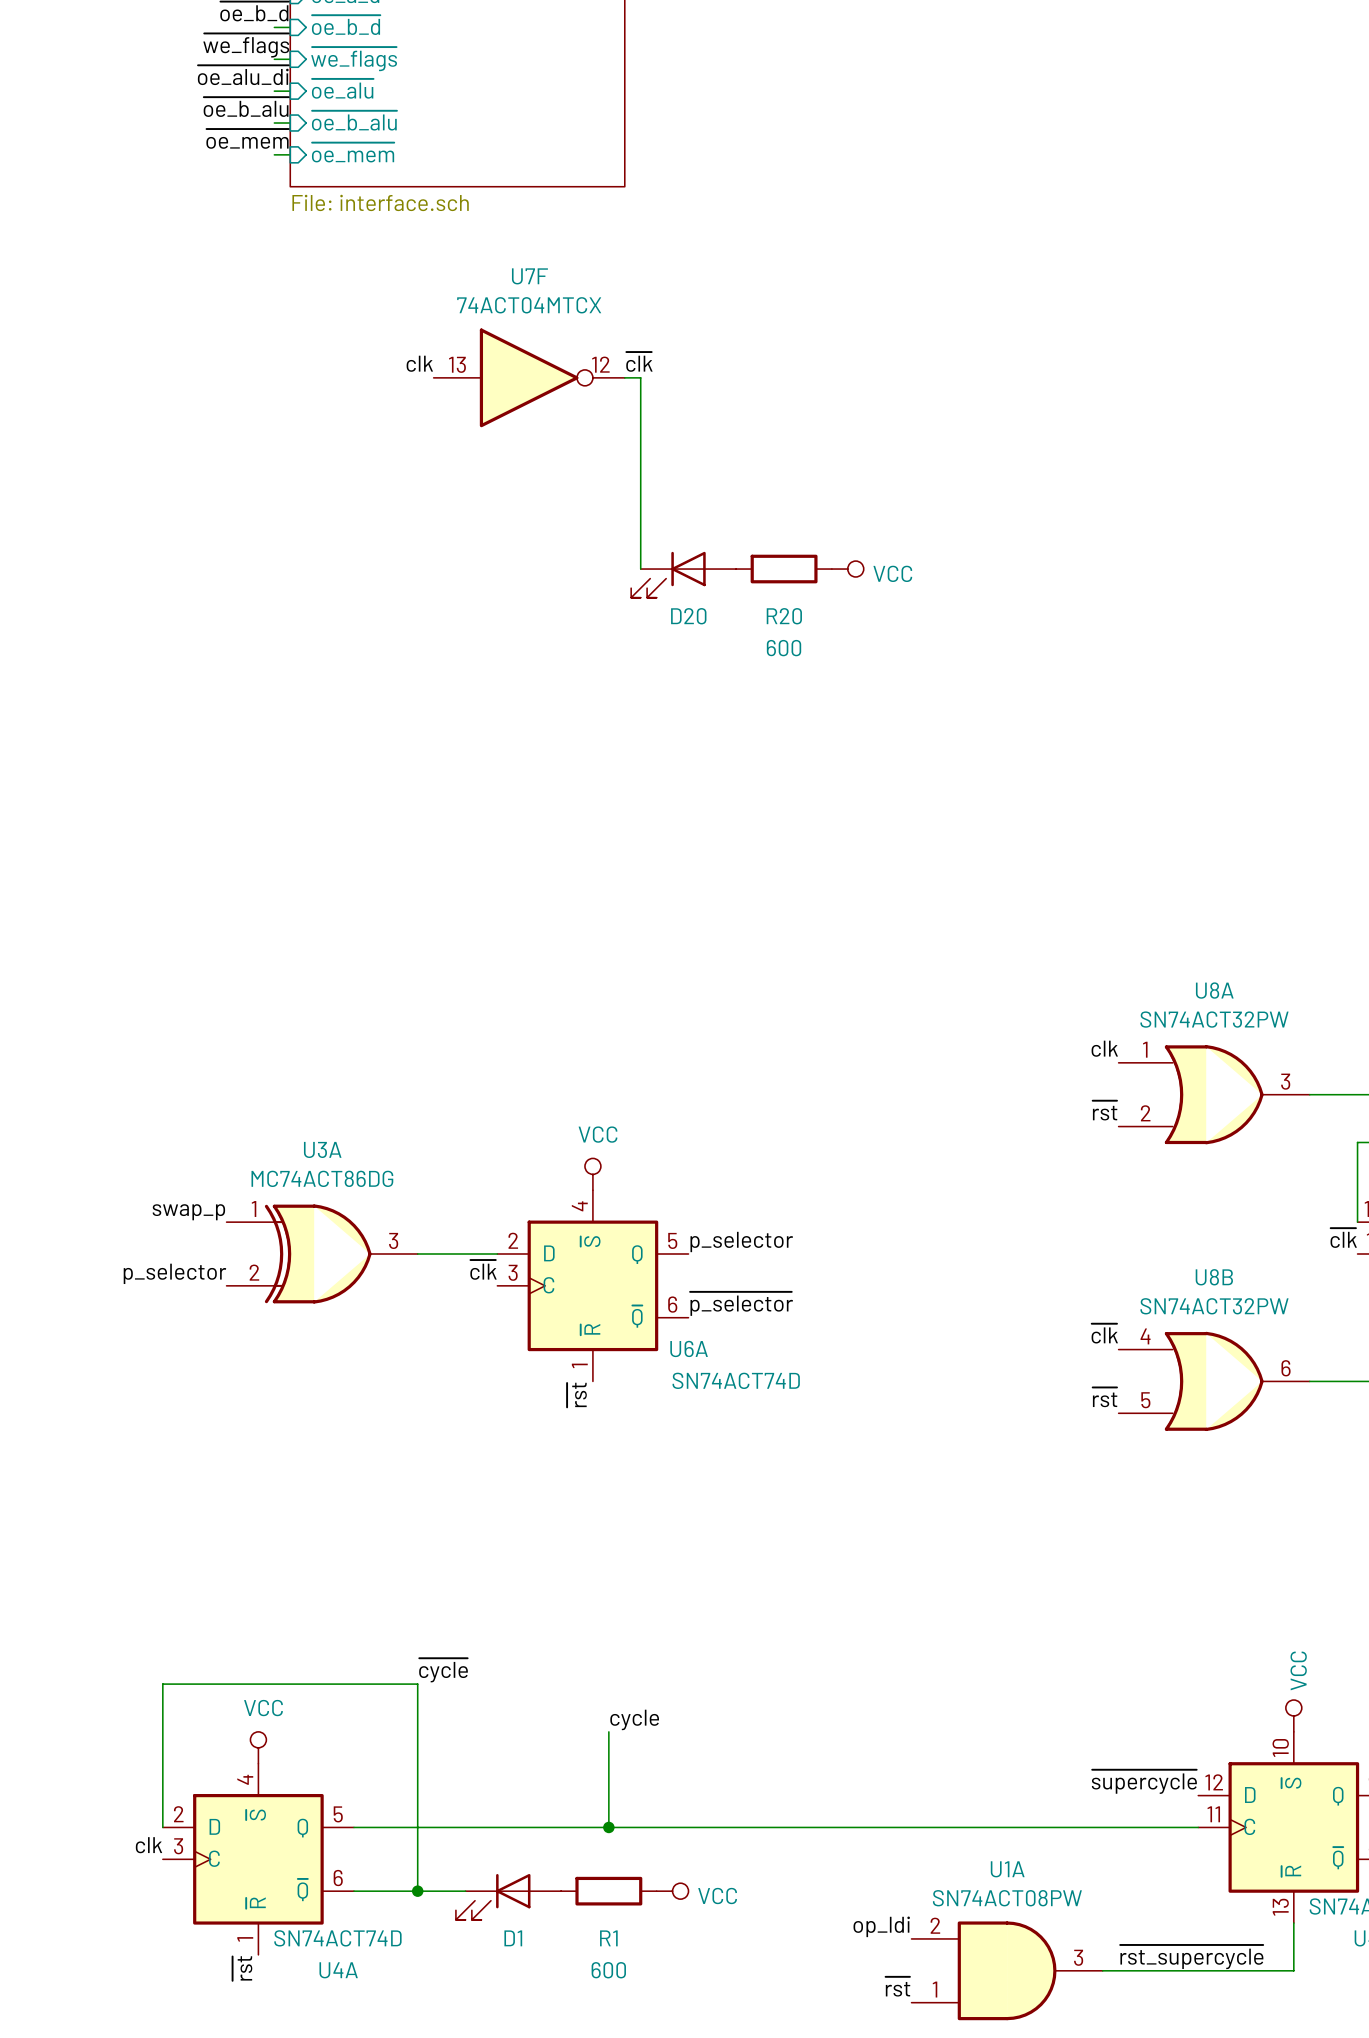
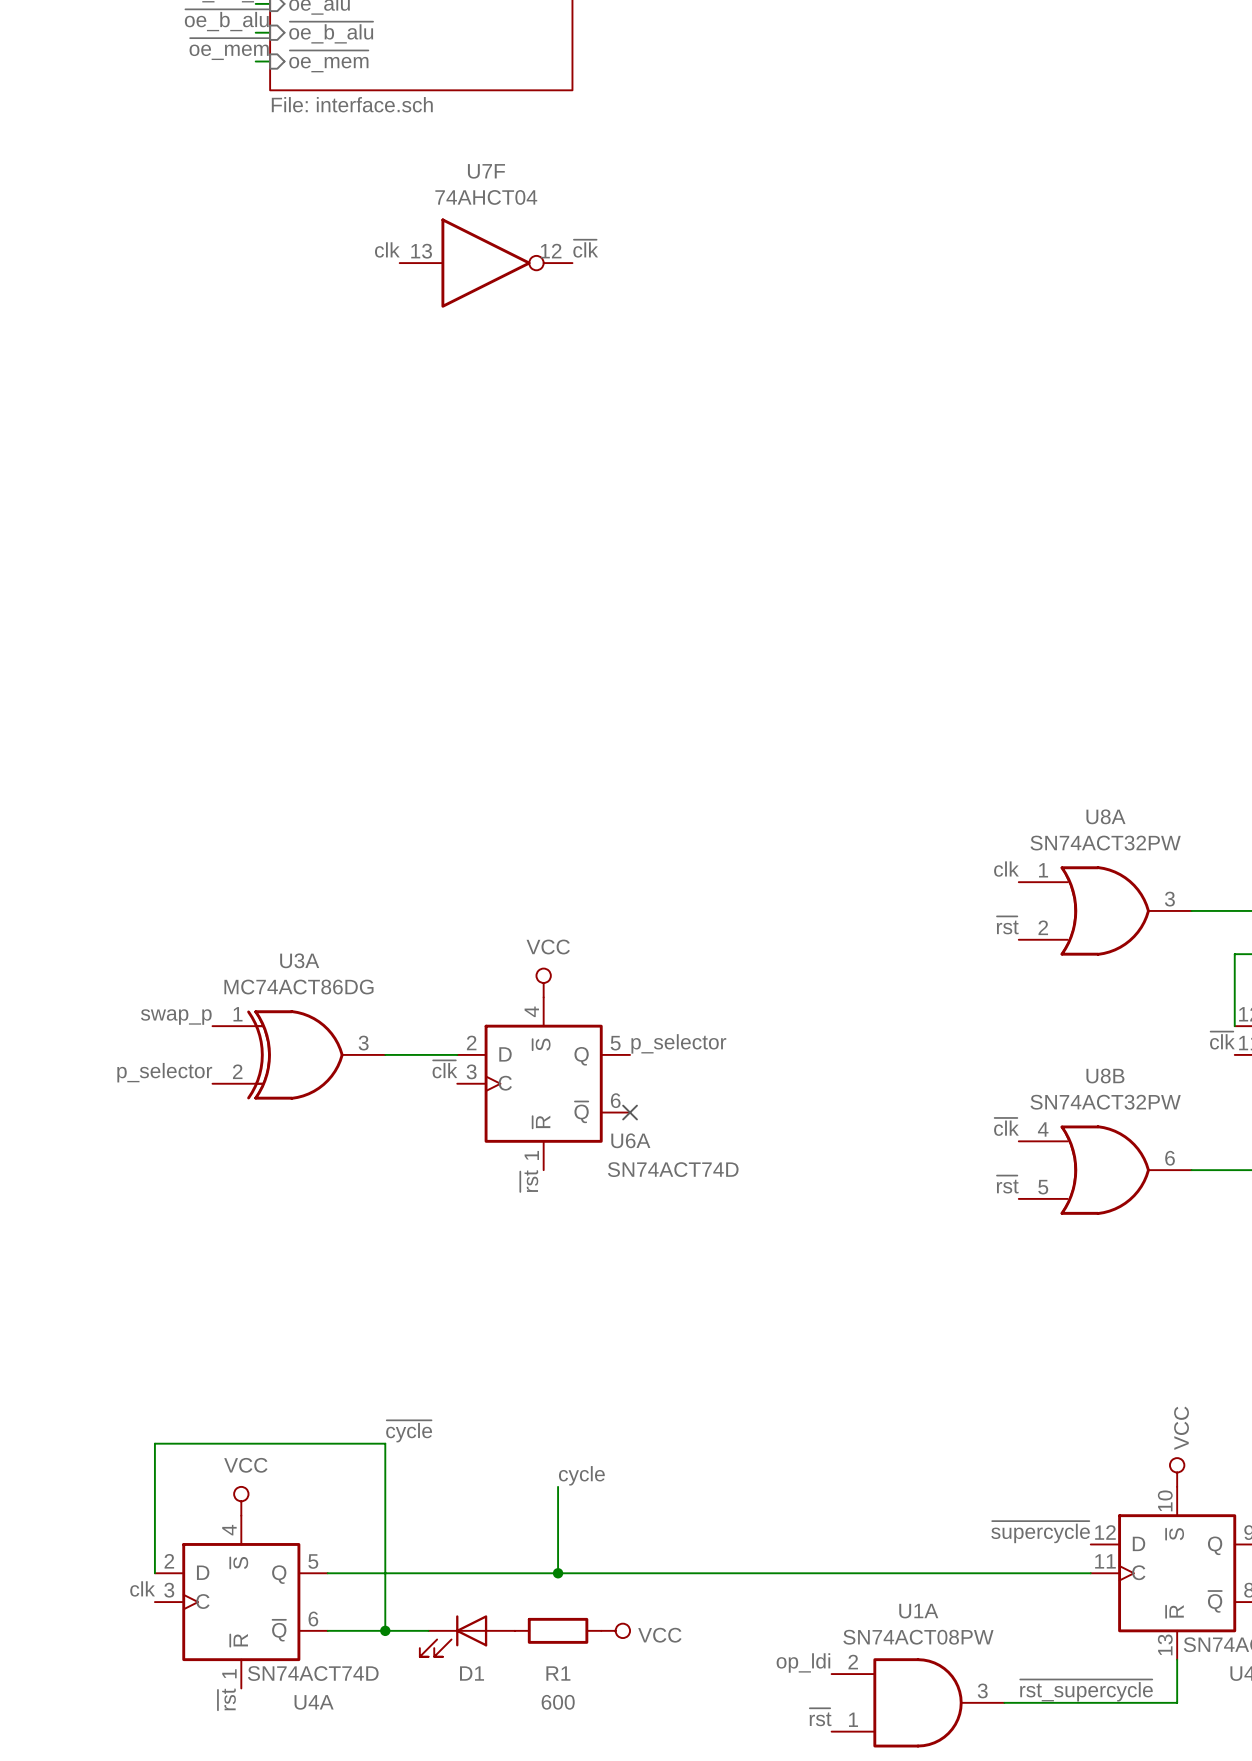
U7F value: 74ACT04MTCX (529, 305) -> 74AHCT04 (486, 197)
wire: (624, 377) (640, 377) (640, 569) -> none
R20: 600 (784, 569) -> none
power symbol: VCC (847, 569) -> none
D20: (683, 574) -> none
label: ~{p_selector} (741, 1303) -> none
no-connect mark: none -> (630, 1112)

